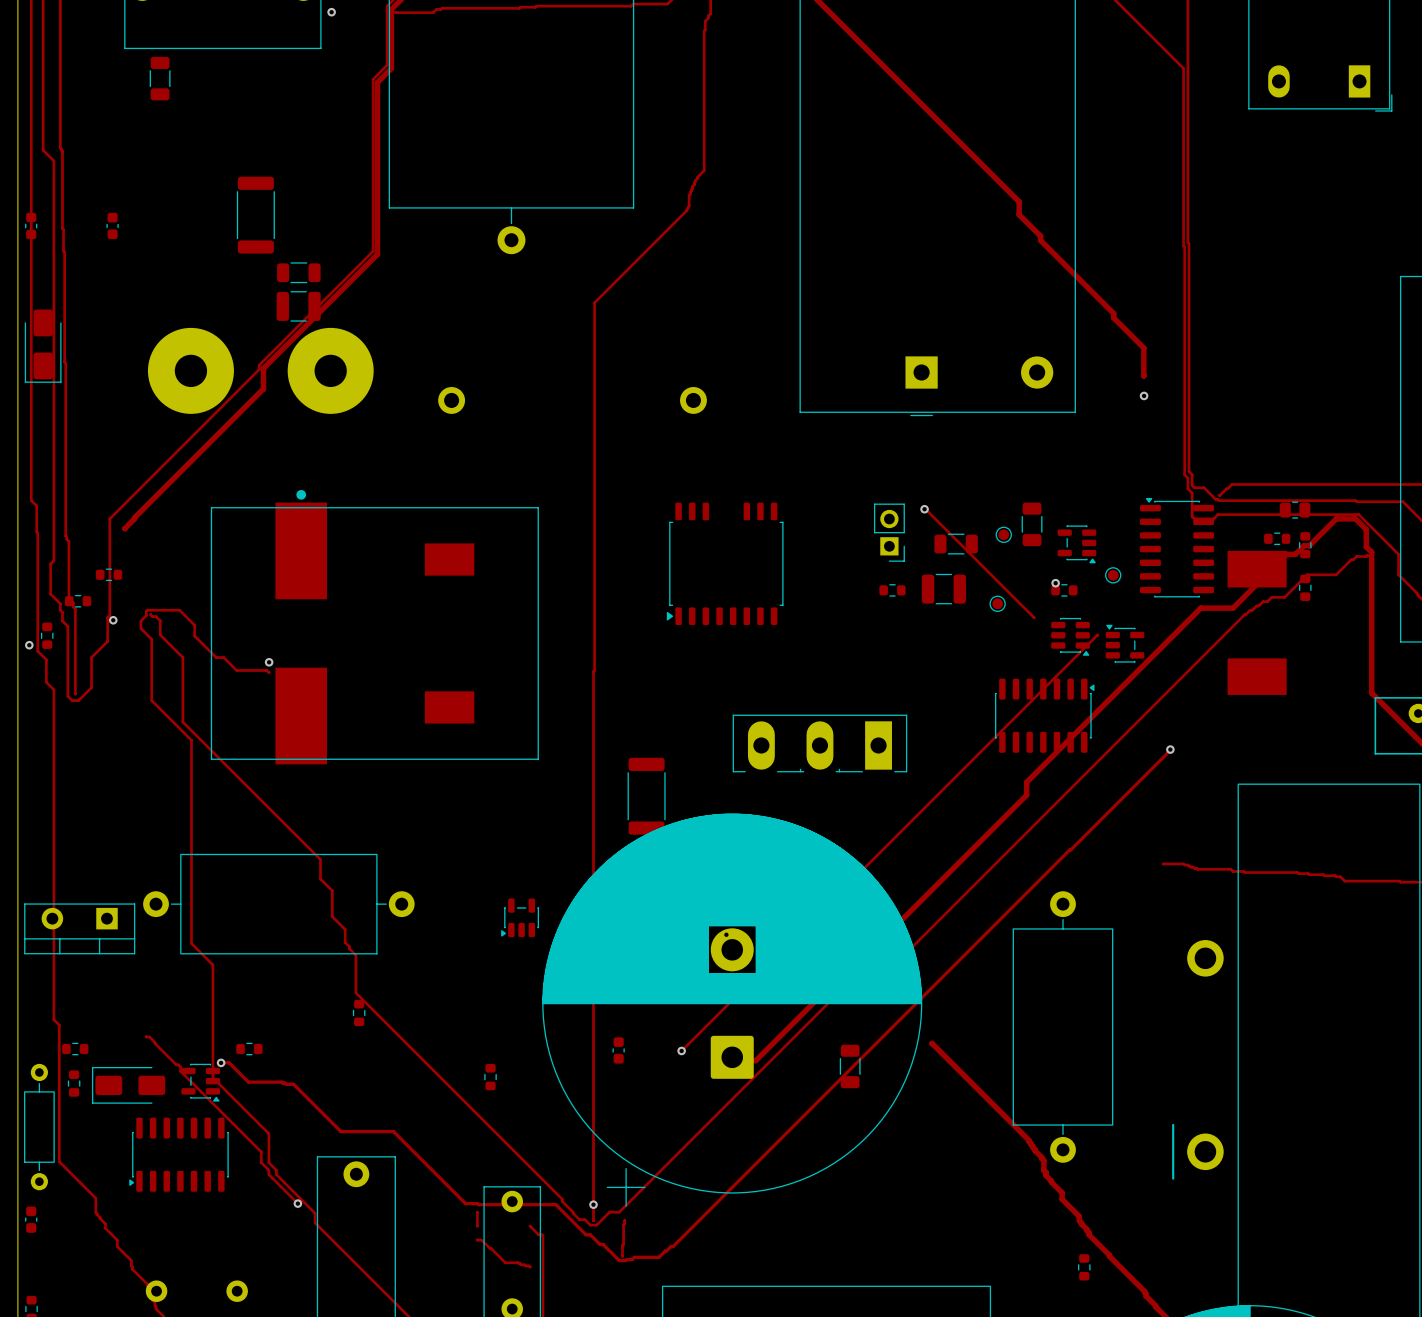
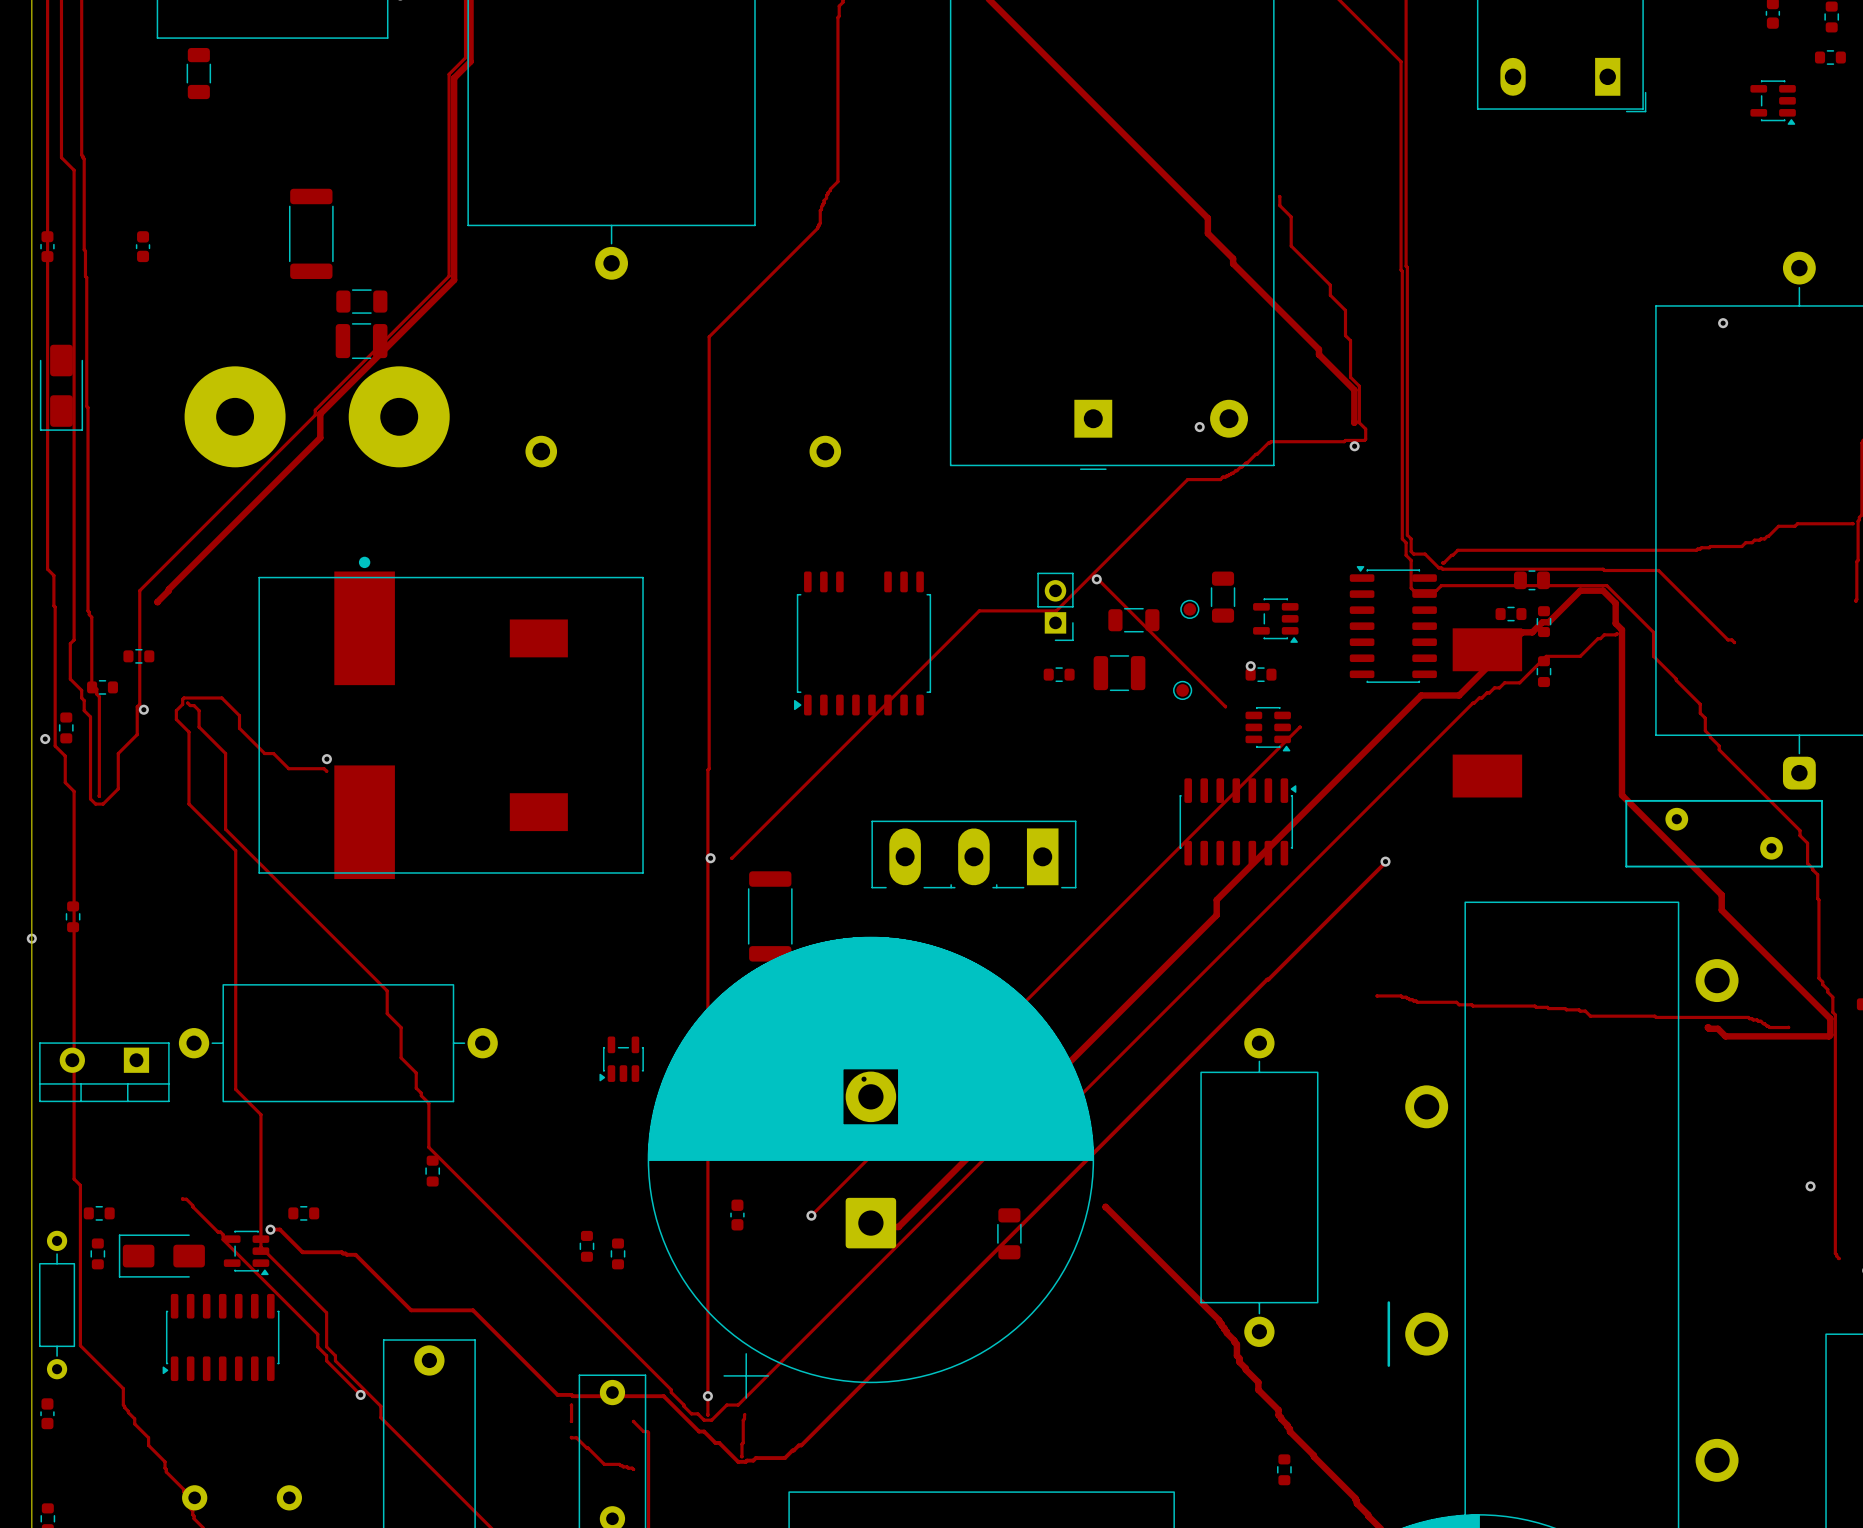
track: none -> (1279, 196) (1279, 205) (1291, 216) (1291, 246) (1330, 285) (1330, 295) (1345, 310) (1345, 335) (1350, 340) (1350, 377) (1359, 386) (1359, 422) (1365, 429) (1365, 439) (1344, 441) (1271, 441) (1247, 463) (1220, 479) (1187, 479) (1056, 610) (979, 610) (731, 858)
via: none -> (1199, 427)
part: (1113, 575) -> none
part: (1125, 643) -> none
via: none -> (710, 858)
part: none -> (73, 916)
via: none -> (31, 938)
part: none -> (618, 1253)

